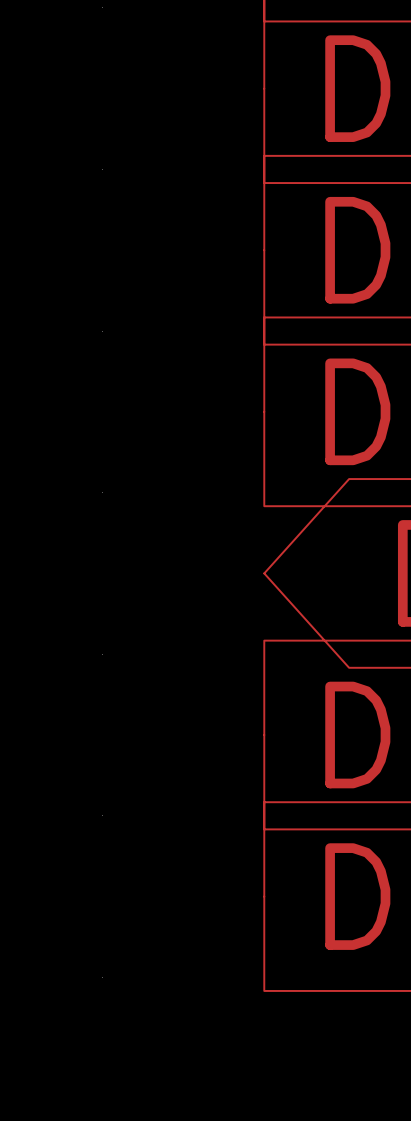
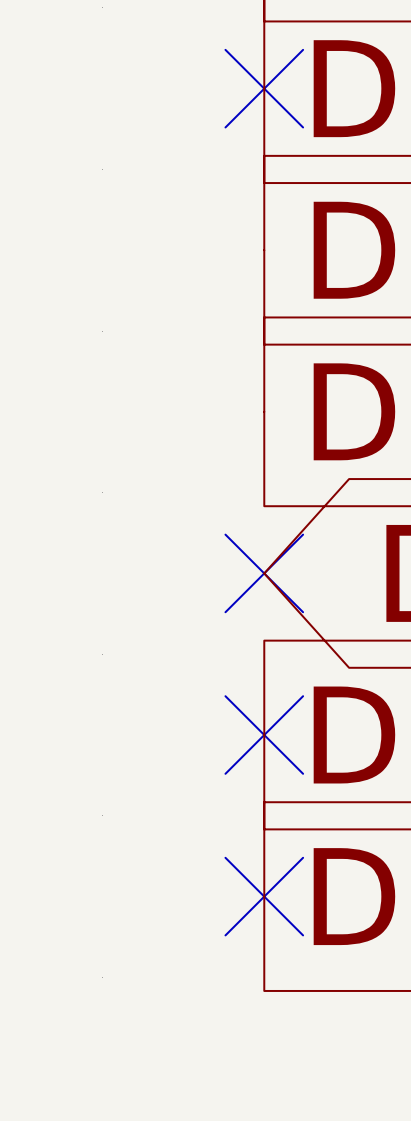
no-connect mark: none -> (264, 88)
no-connect mark: none -> (264, 573)
no-connect mark: none -> (264, 735)
no-connect mark: none -> (264, 896)

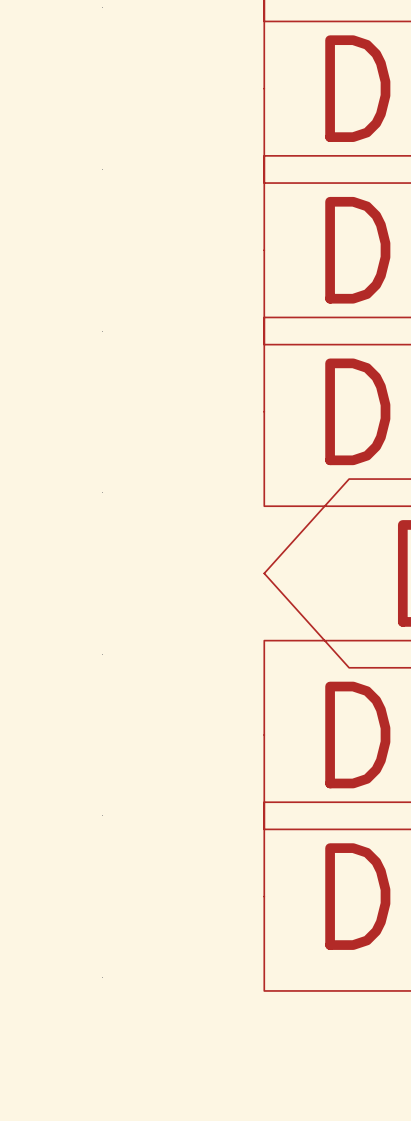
no-connect mark: (264, 88) -> none
no-connect mark: (264, 573) -> none
no-connect mark: (264, 735) -> none
no-connect mark: (264, 896) -> none

